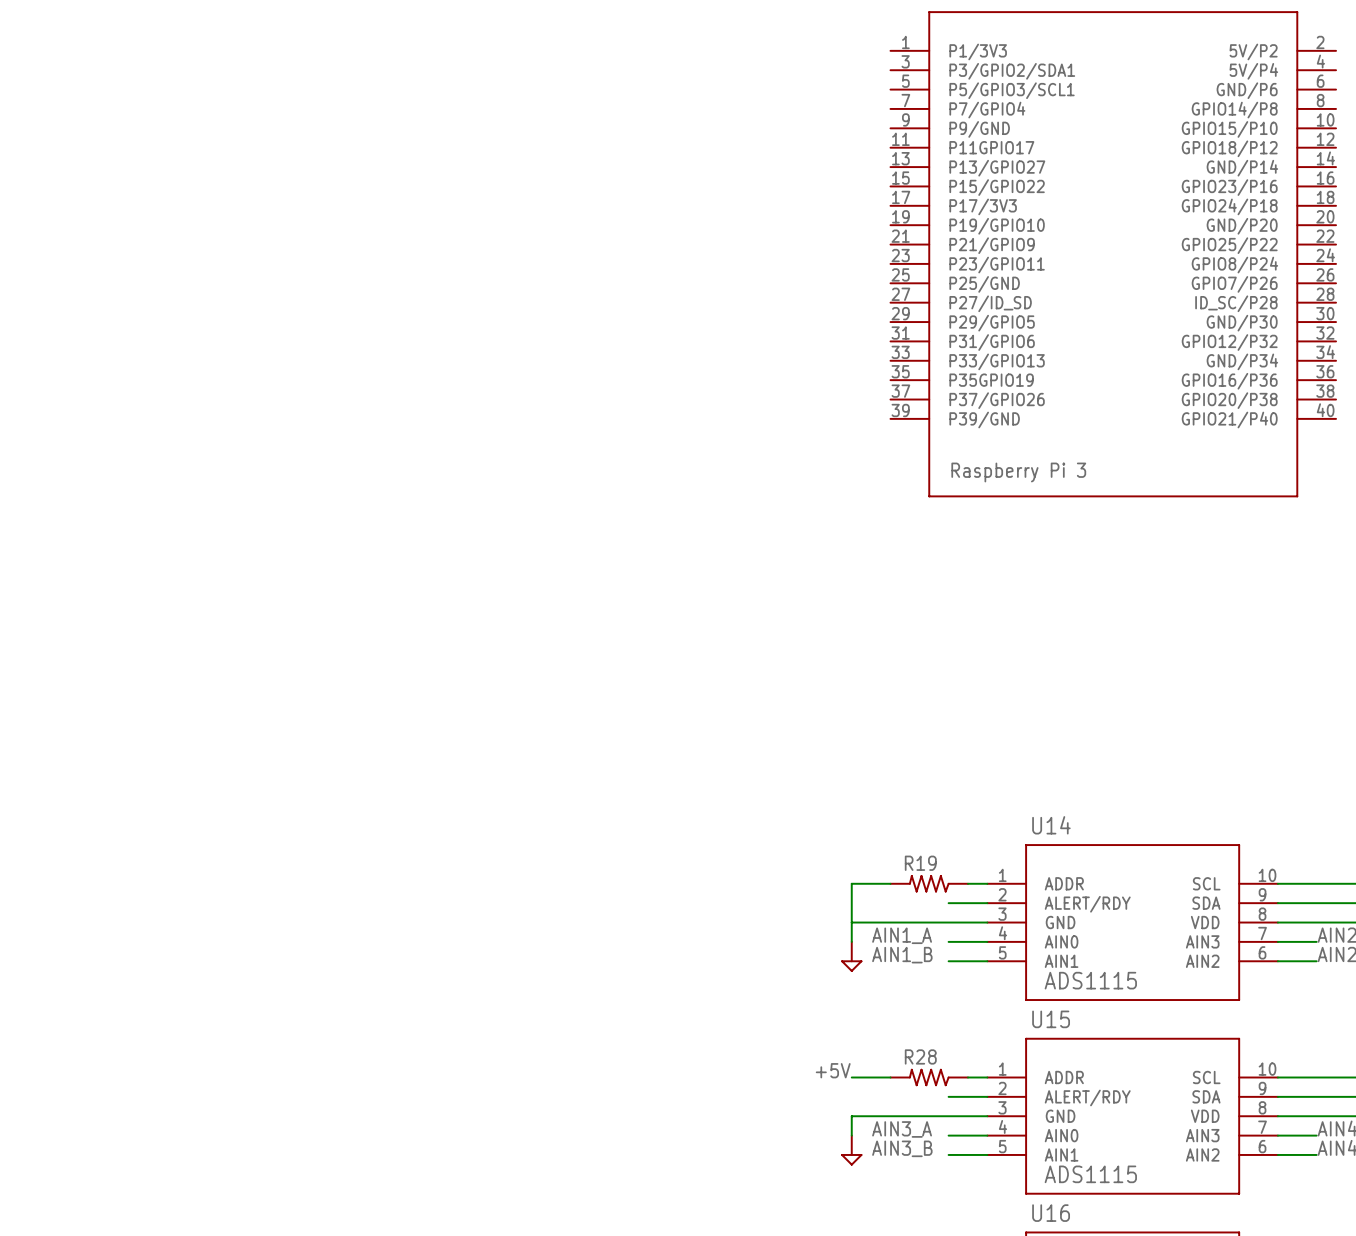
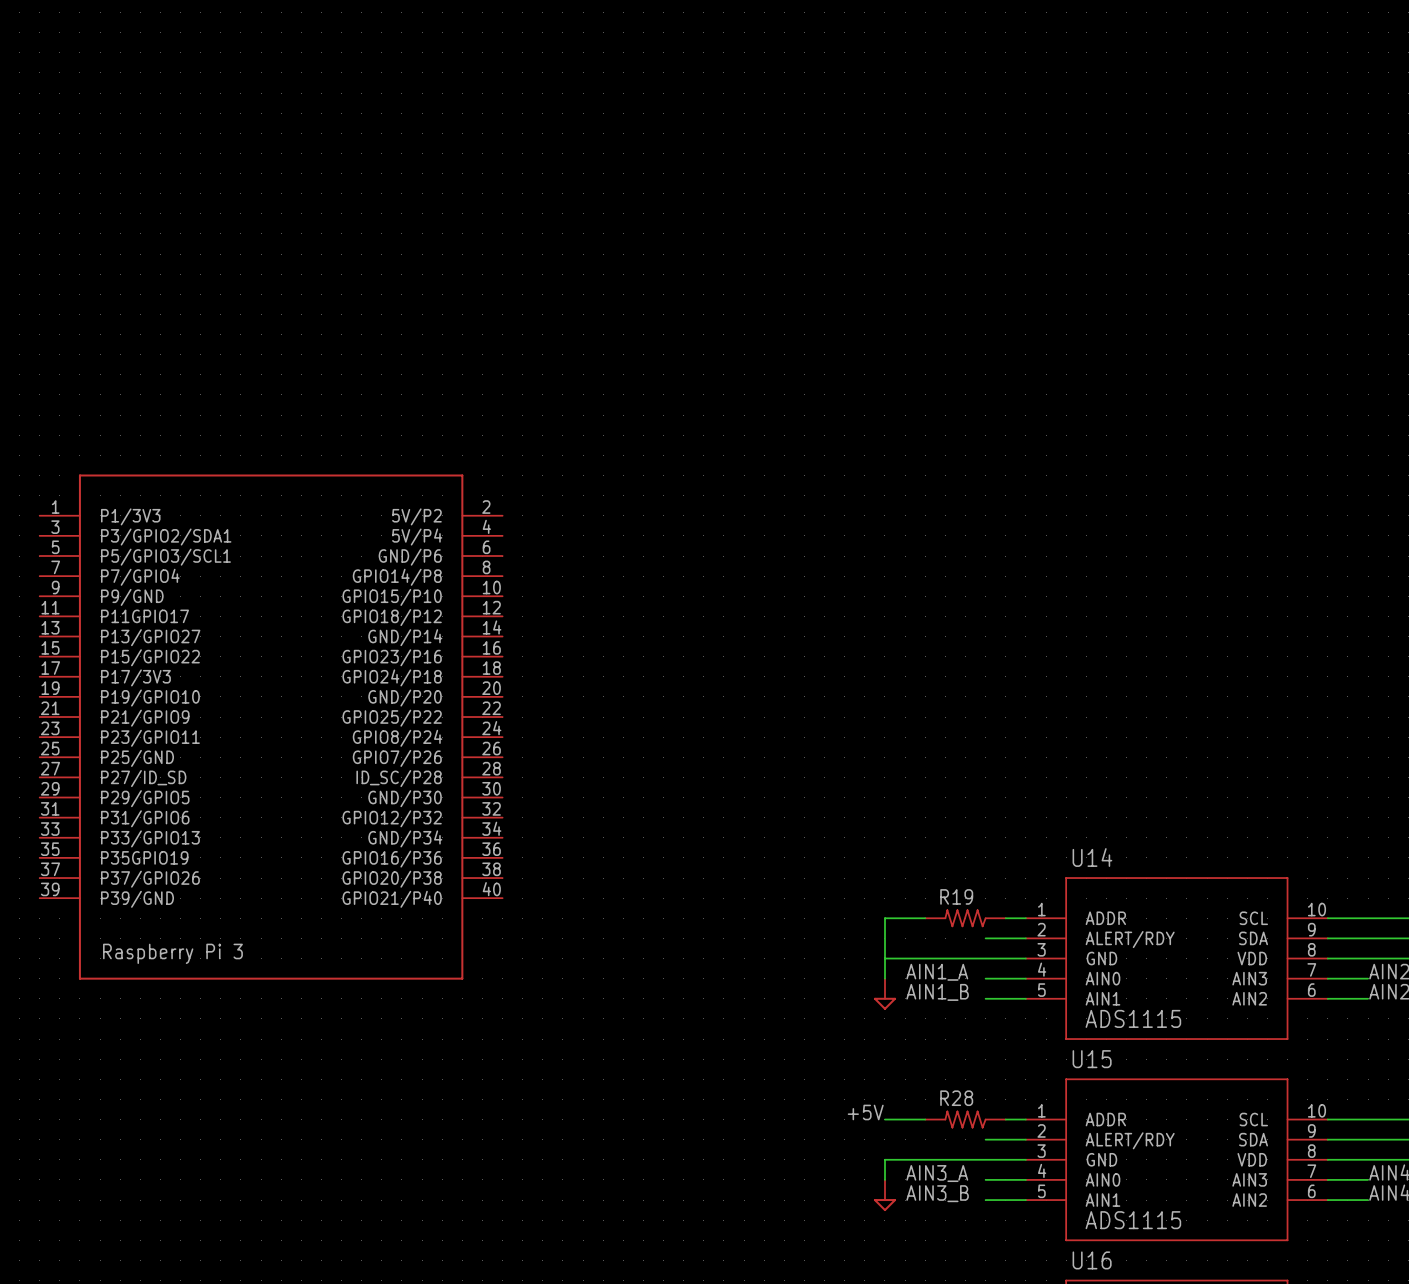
part: (1113, 254) -> none
part: none -> (271, 727)

